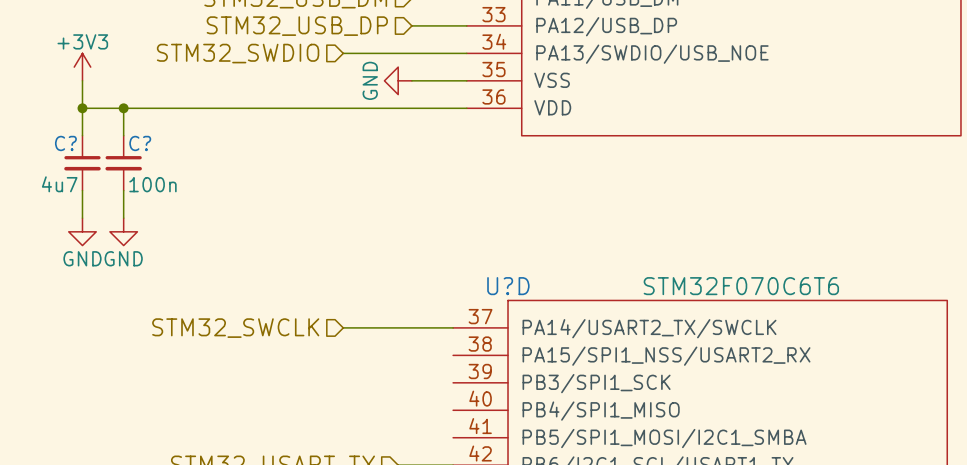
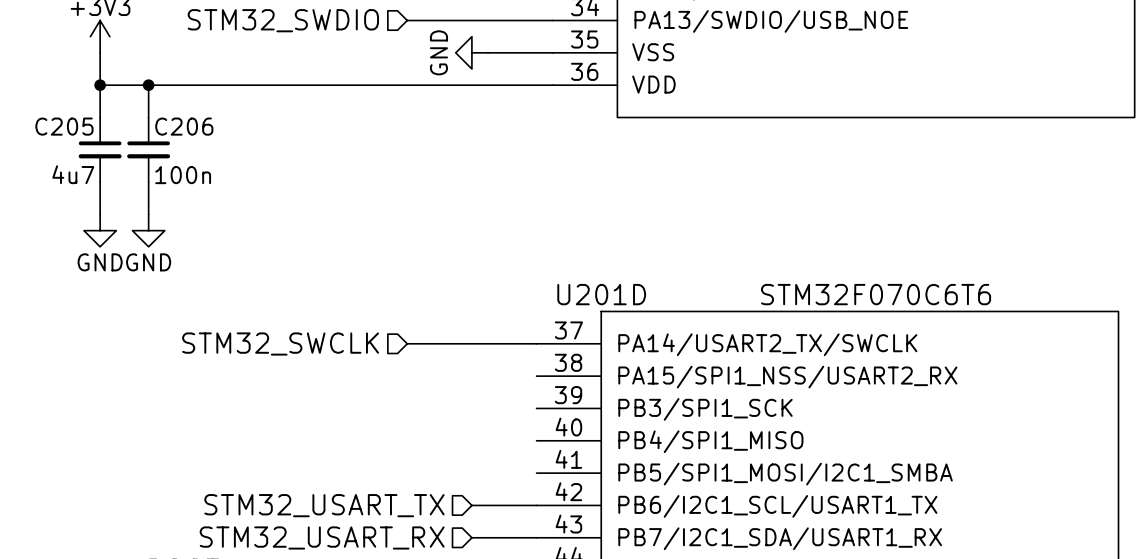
C? name: C? (65, 143) -> C205 (64, 126)
C? name: C? (140, 143) -> C206 (184, 126)
U?D name: U?D (508, 286) -> U201D (601, 294)

